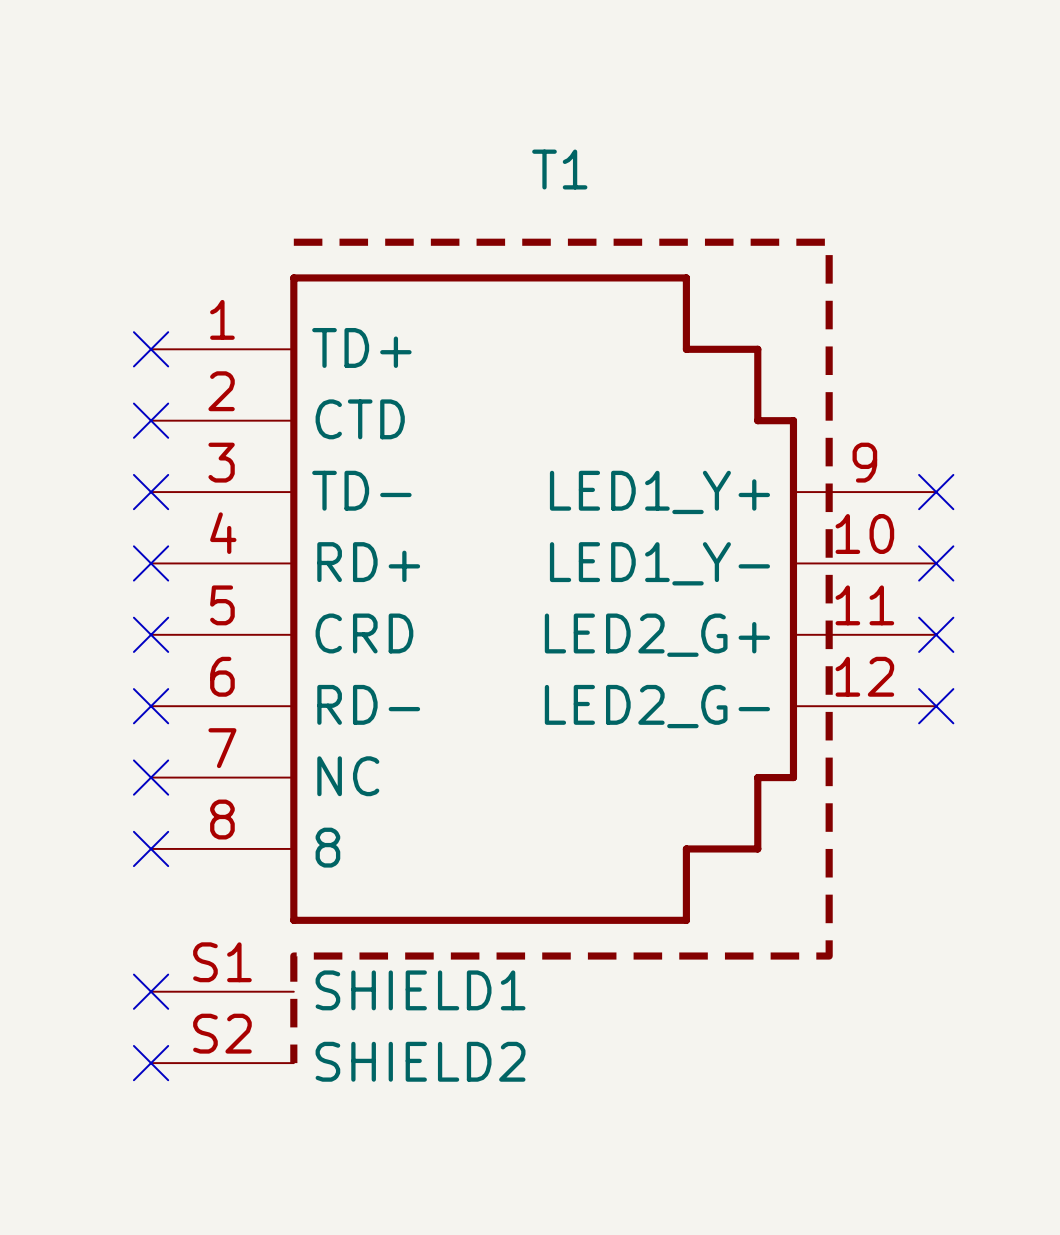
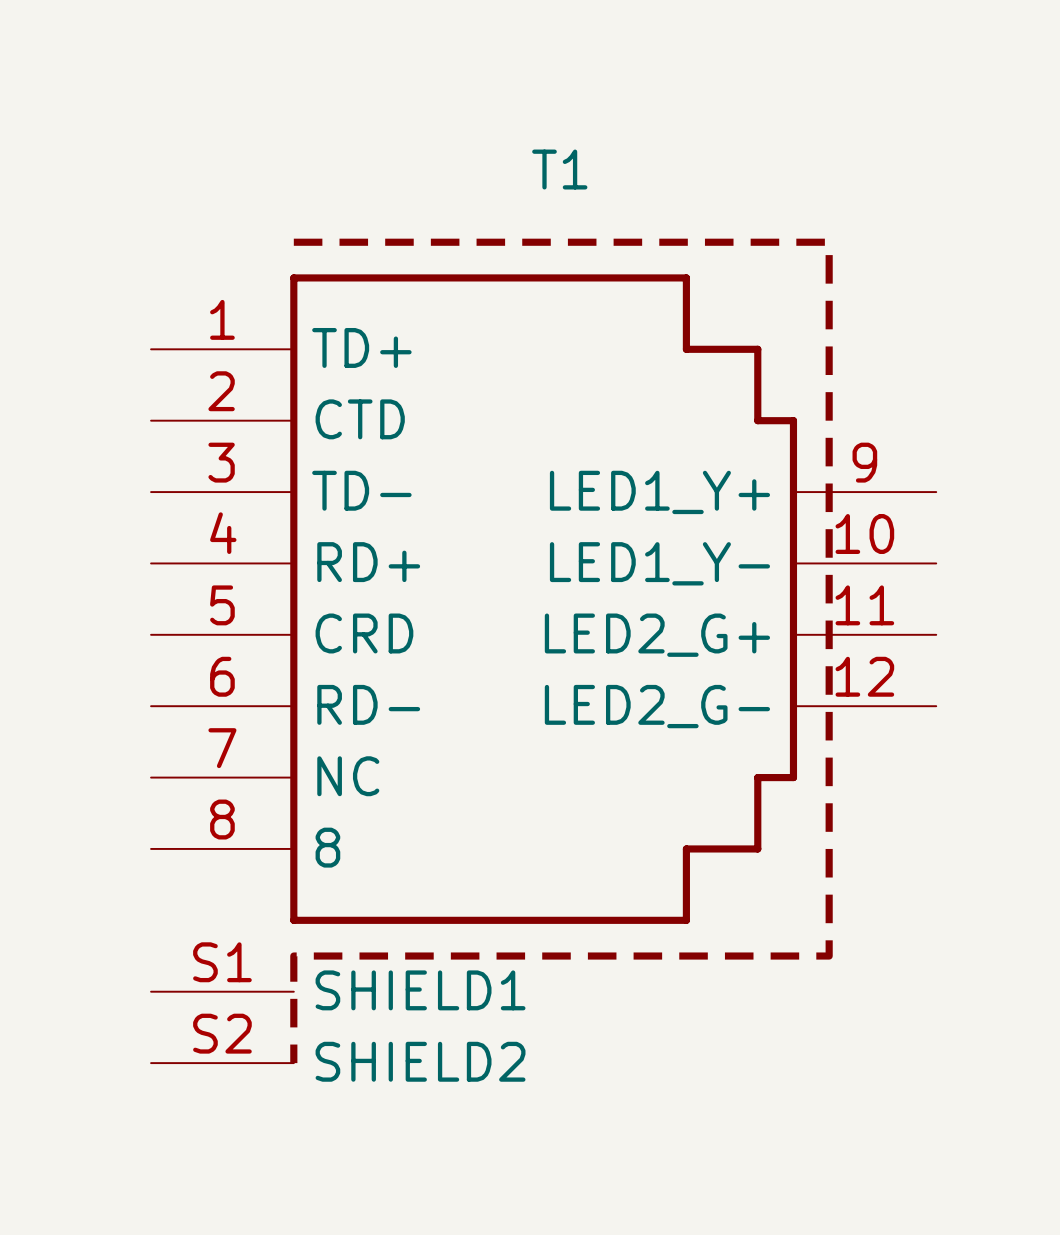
no-connect mark: (151, 349) -> none
no-connect mark: (151, 420) -> none
no-connect mark: (151, 492) -> none
no-connect mark: (936, 492) -> none
no-connect mark: (151, 563) -> none
no-connect mark: (936, 563) -> none
no-connect mark: (151, 634) -> none
no-connect mark: (936, 634) -> none
no-connect mark: (151, 706) -> none
no-connect mark: (936, 706) -> none
no-connect mark: (151, 777) -> none
no-connect mark: (151, 848) -> none
no-connect mark: (151, 991) -> none
no-connect mark: (151, 1063) -> none

